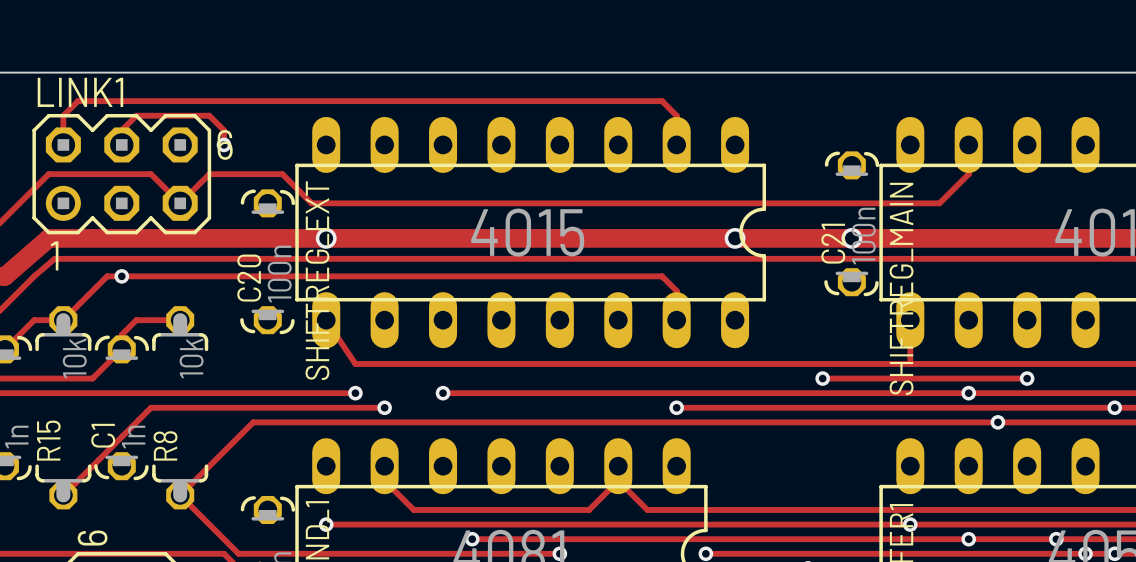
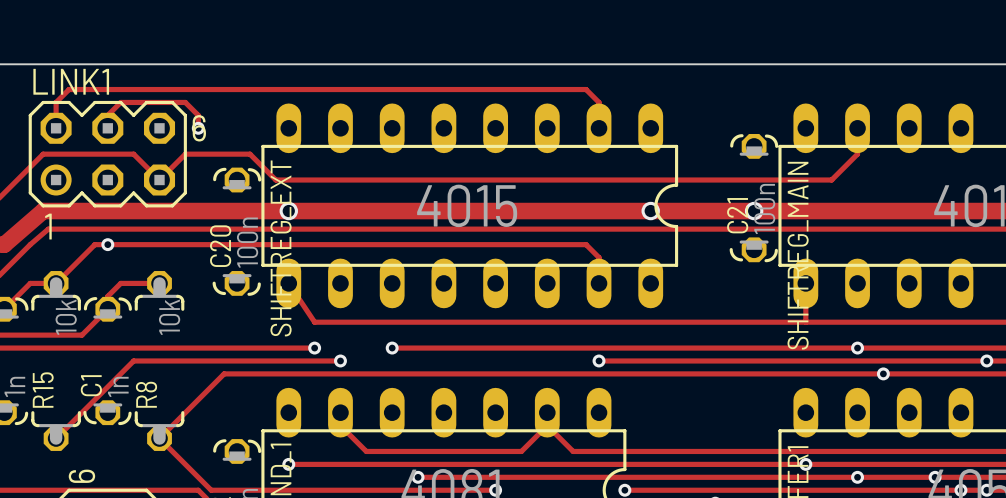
track: (822, 378) (1027, 378) -> none
via: (822, 378) -> none
via: (1027, 378) -> none

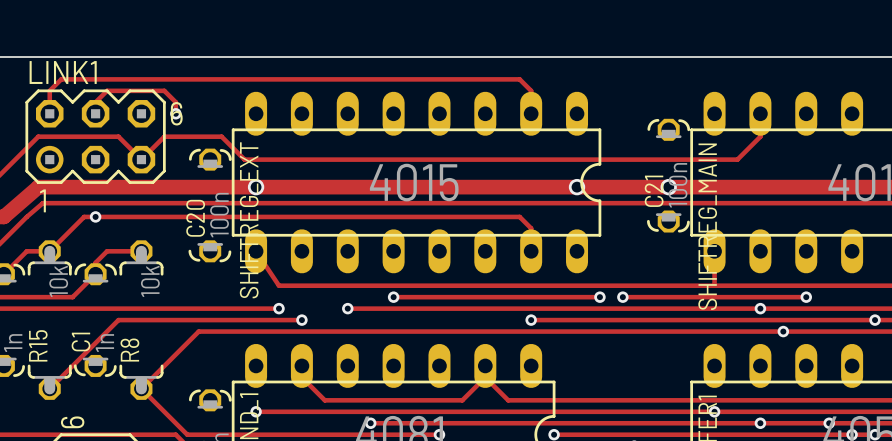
track: none -> (393, 297) (599, 297)
via: none -> (393, 297)
via: none -> (599, 297)
track: none -> (622, 297) (806, 297)
via: none -> (622, 297)
via: none -> (806, 297)

